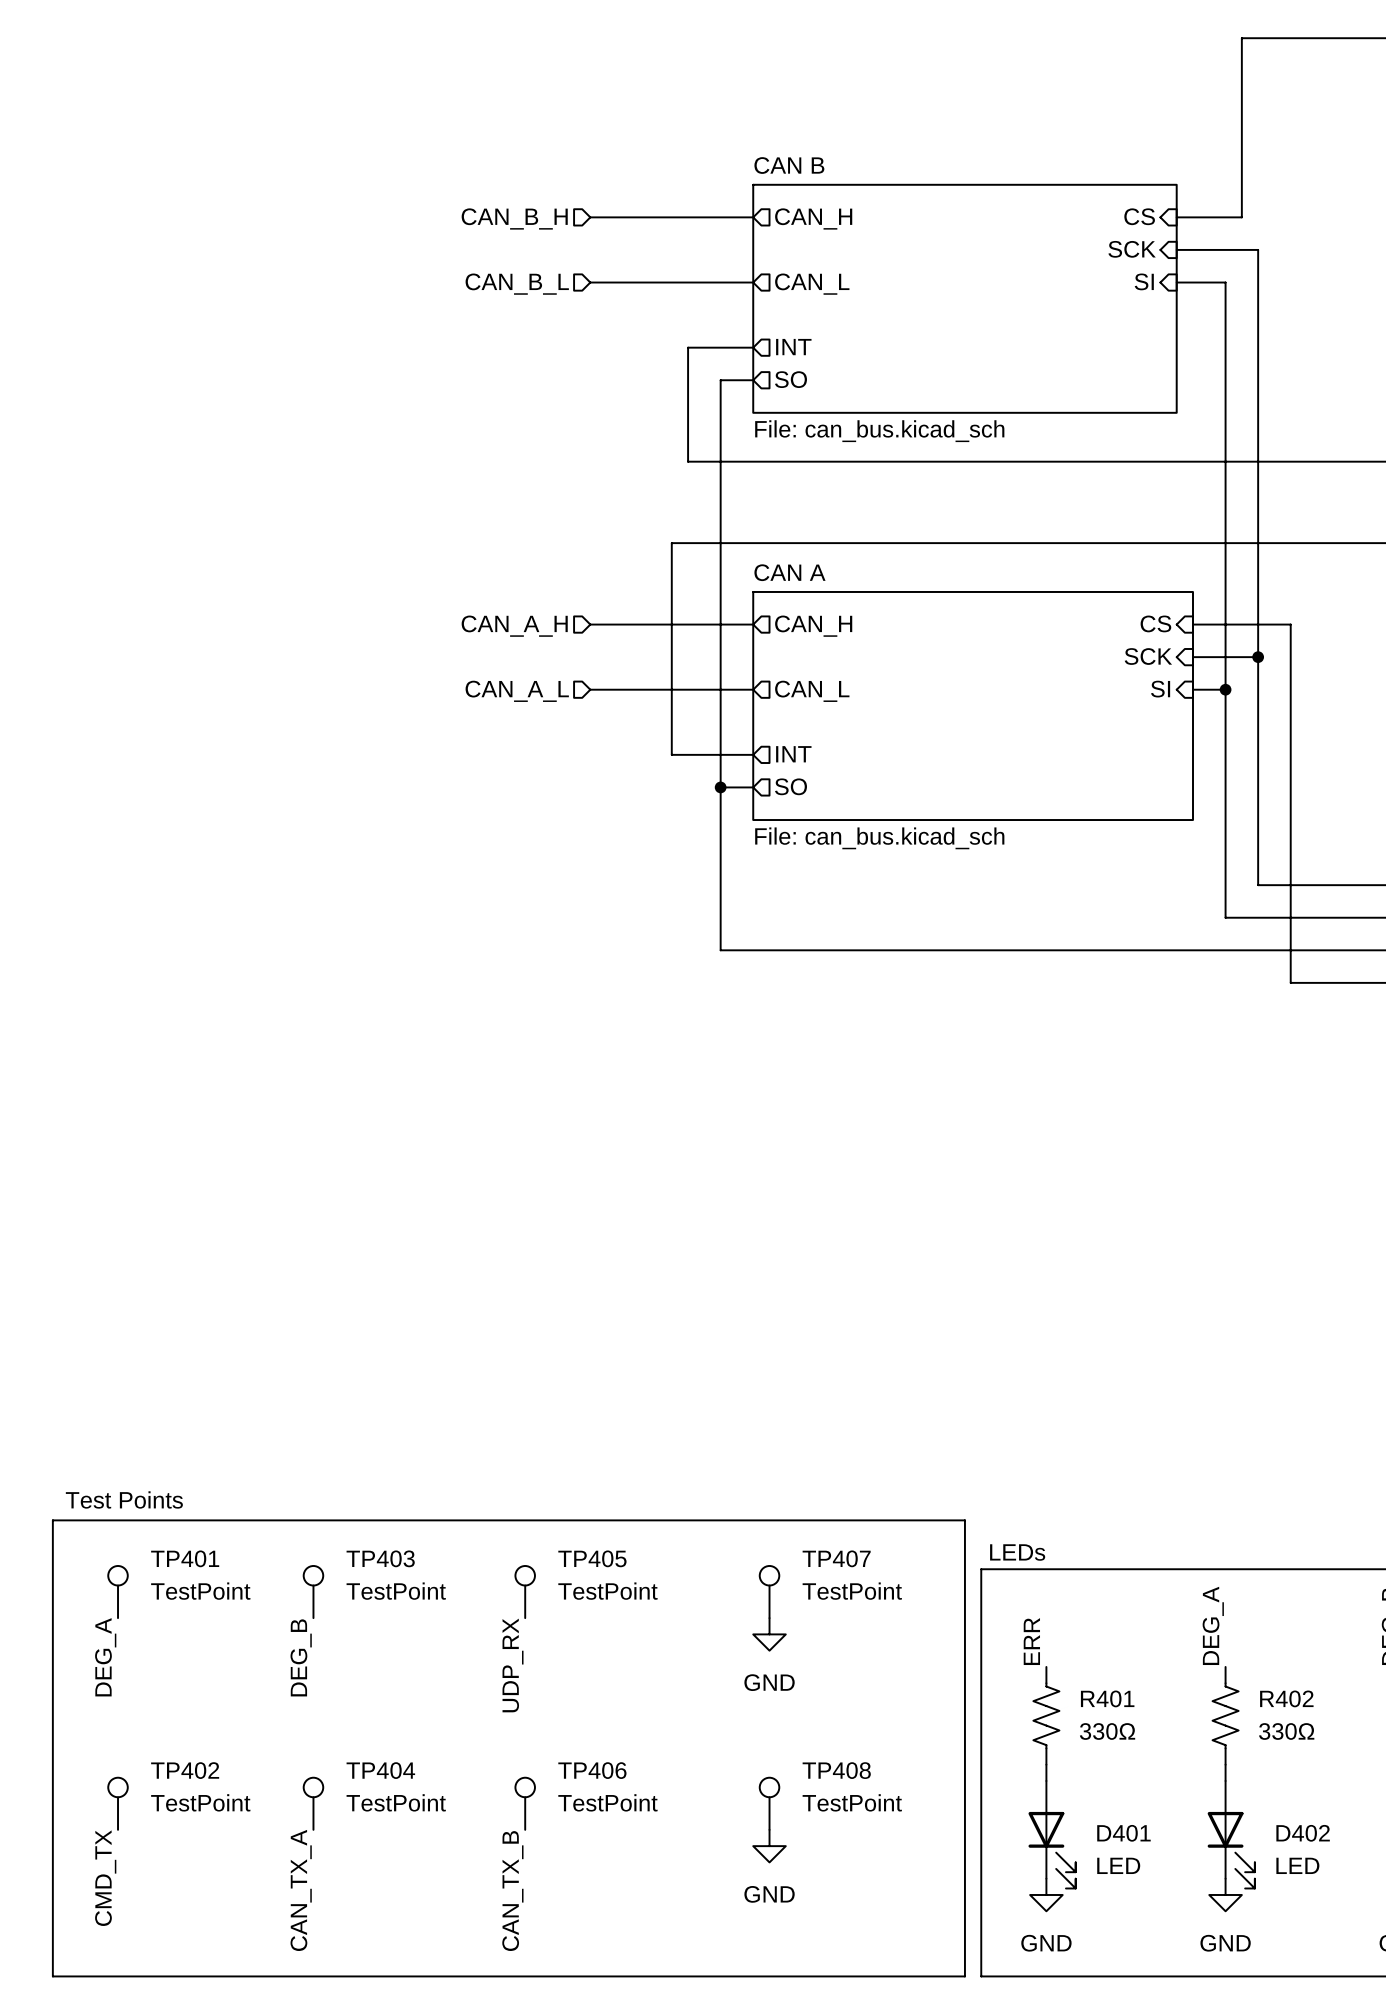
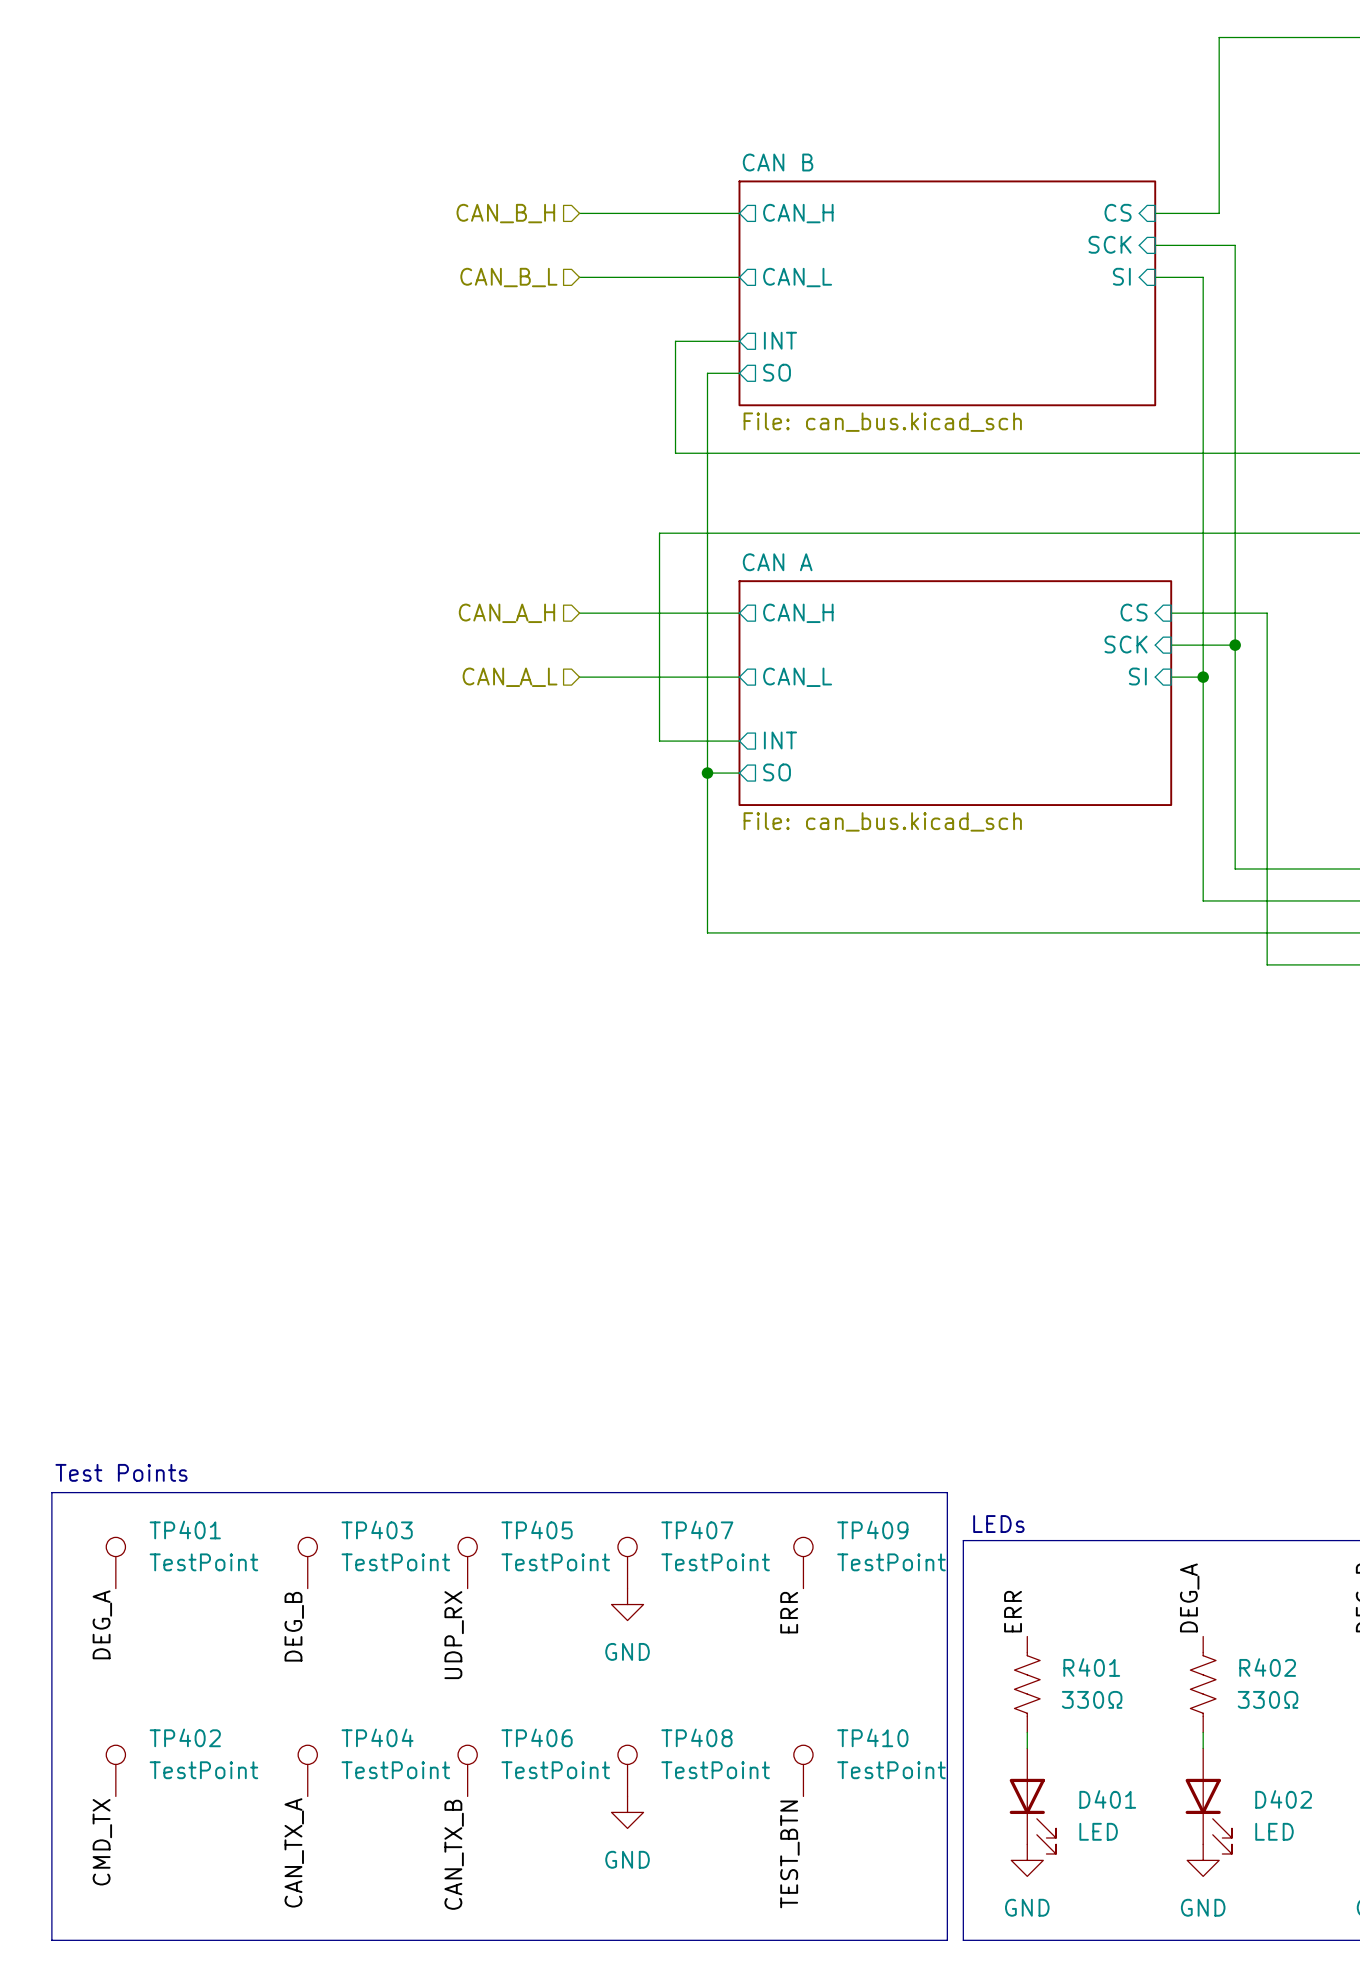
TP405 position: (525, 1592) -> (467, 1562)
TP407 position: (769, 1592) -> (627, 1562)
TP409: none -> TestPoint (803, 1562)
power symbol: none -> GND (627, 1604)
power symbol: GND (769, 1634) -> none
label: none -> ERR (789, 1612)
label position: UDP_RX (513, 1665) -> UDP_RX (454, 1635)
TP406 position: (525, 1803) -> (467, 1770)
TP408 position: (769, 1803) -> (627, 1770)
TP410: none -> TestPoint (803, 1770)
power symbol: none -> GND (627, 1812)
power symbol: GND (769, 1846) -> none
label position: CAN_TX_B (512, 1891) -> CAN_TX_B (454, 1854)
label: none -> TEST_BTN (789, 1854)

